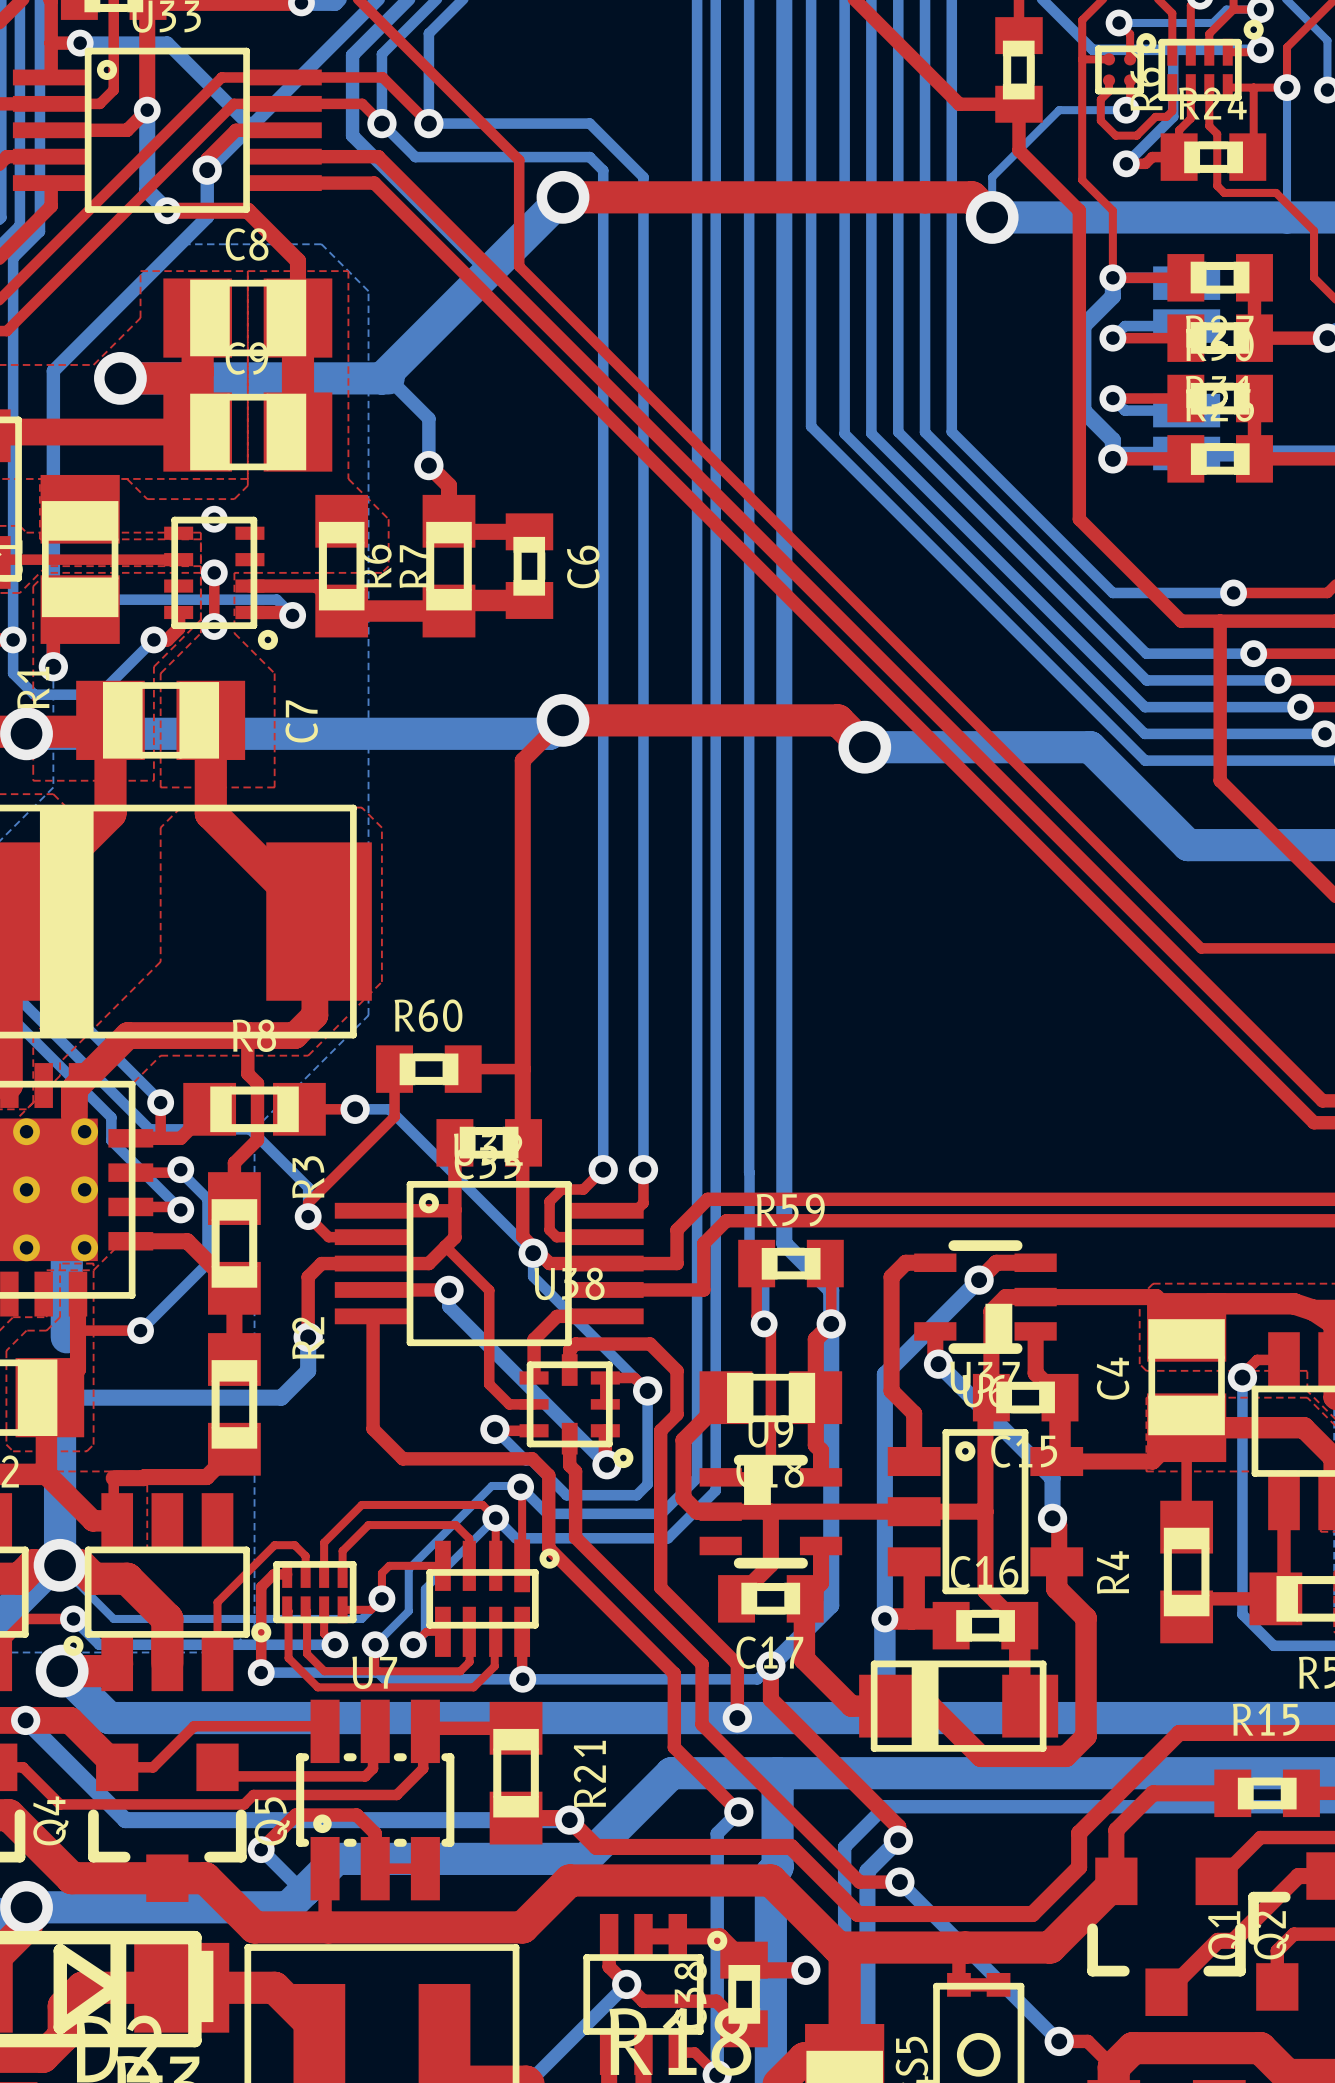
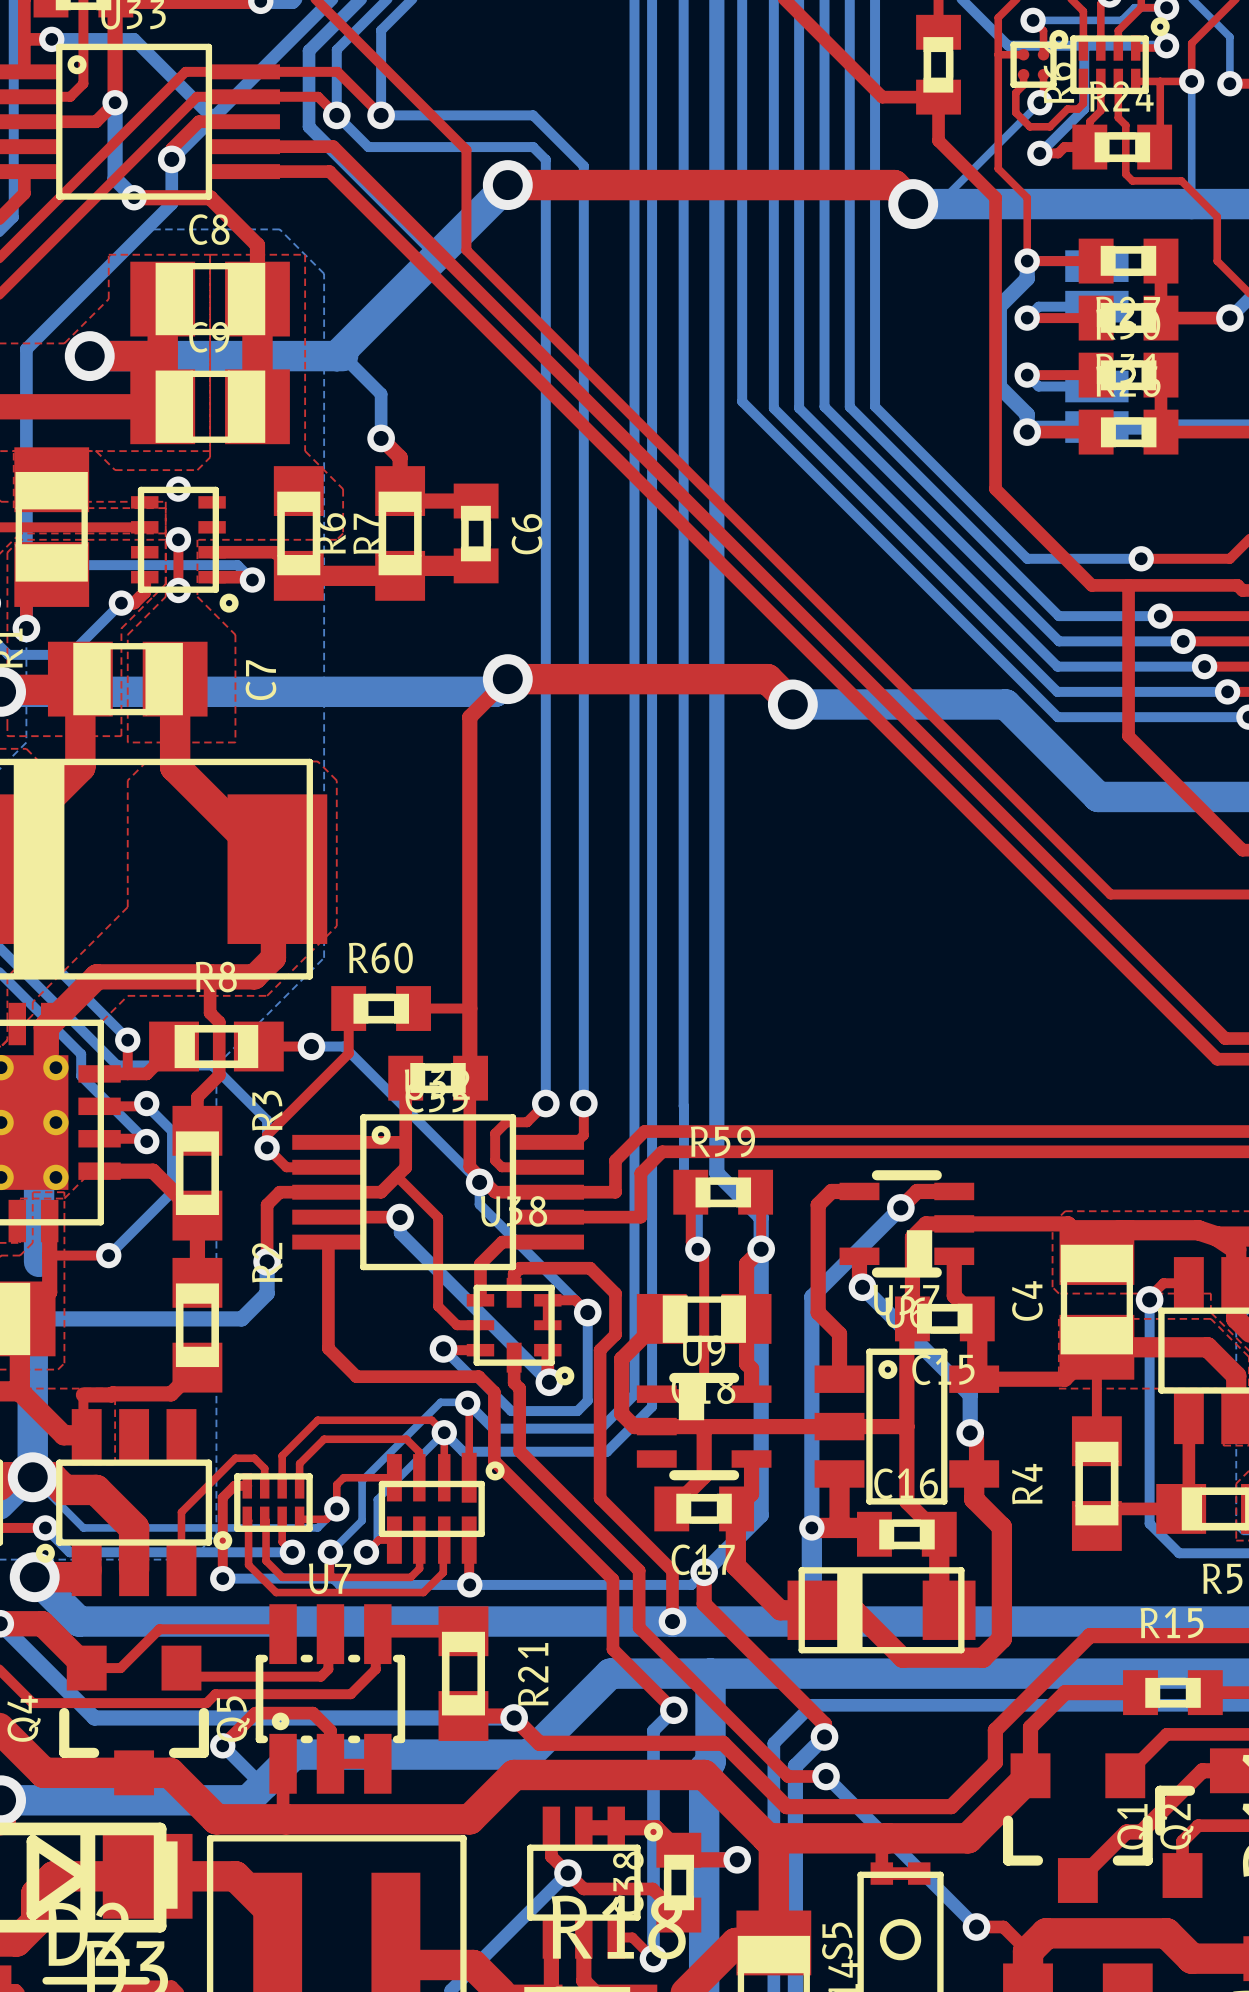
bottom track: (1126, 110) (1059, 110) (992, 177) (992, 217) -> (1039, 102) (938, 204) (913, 204)

